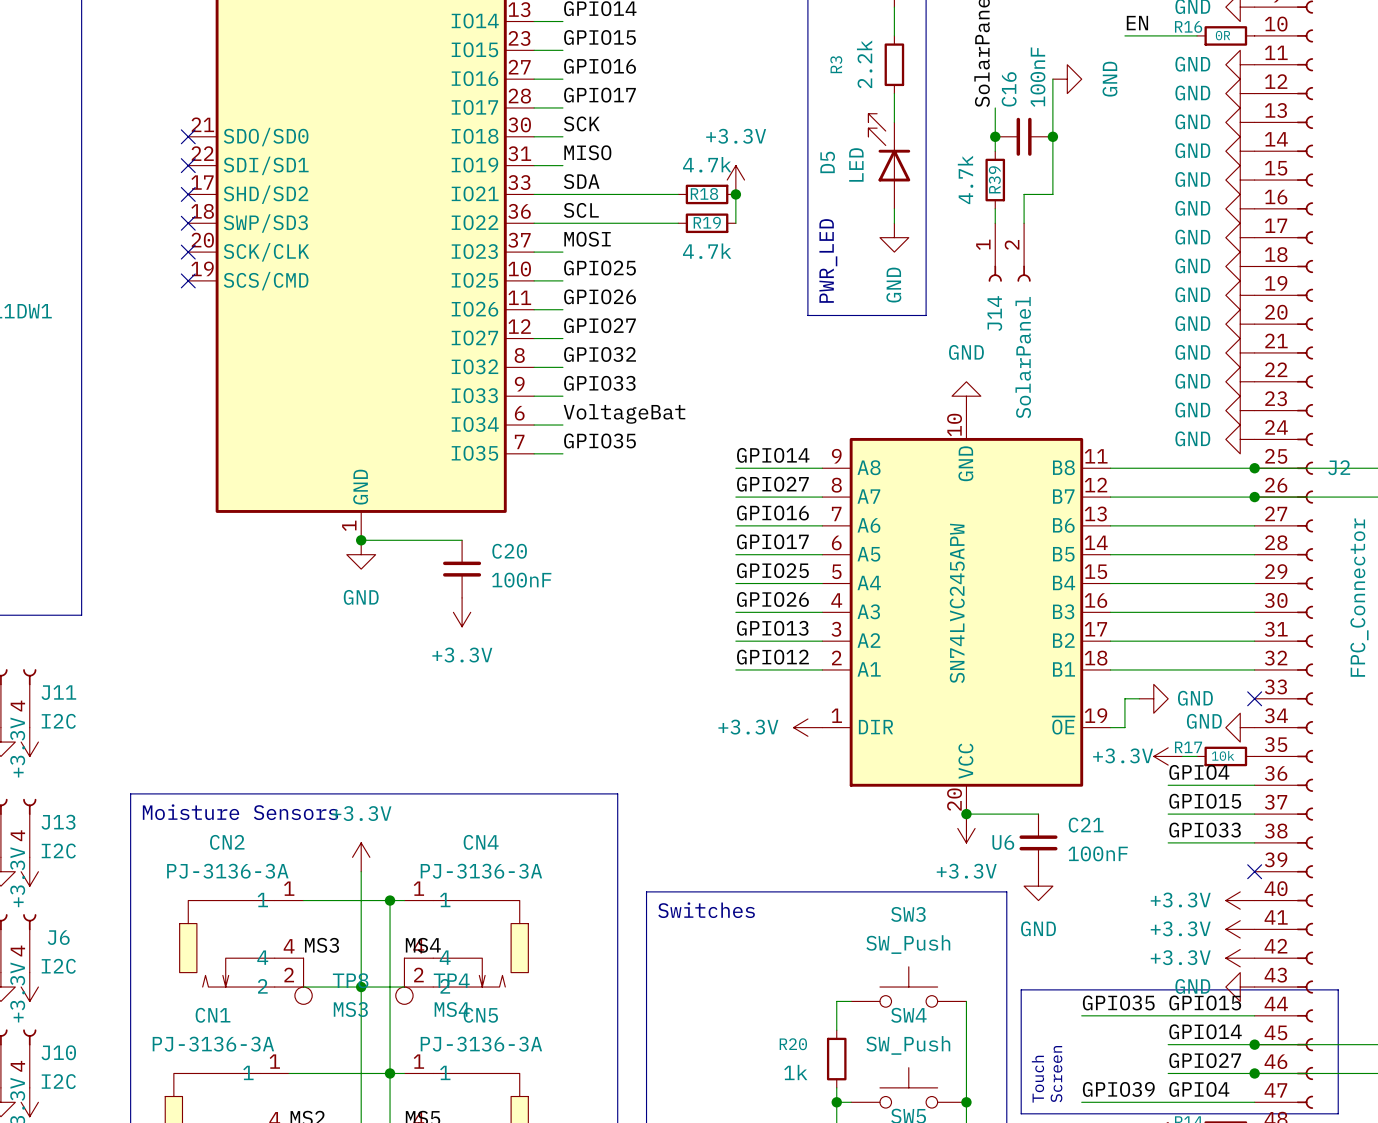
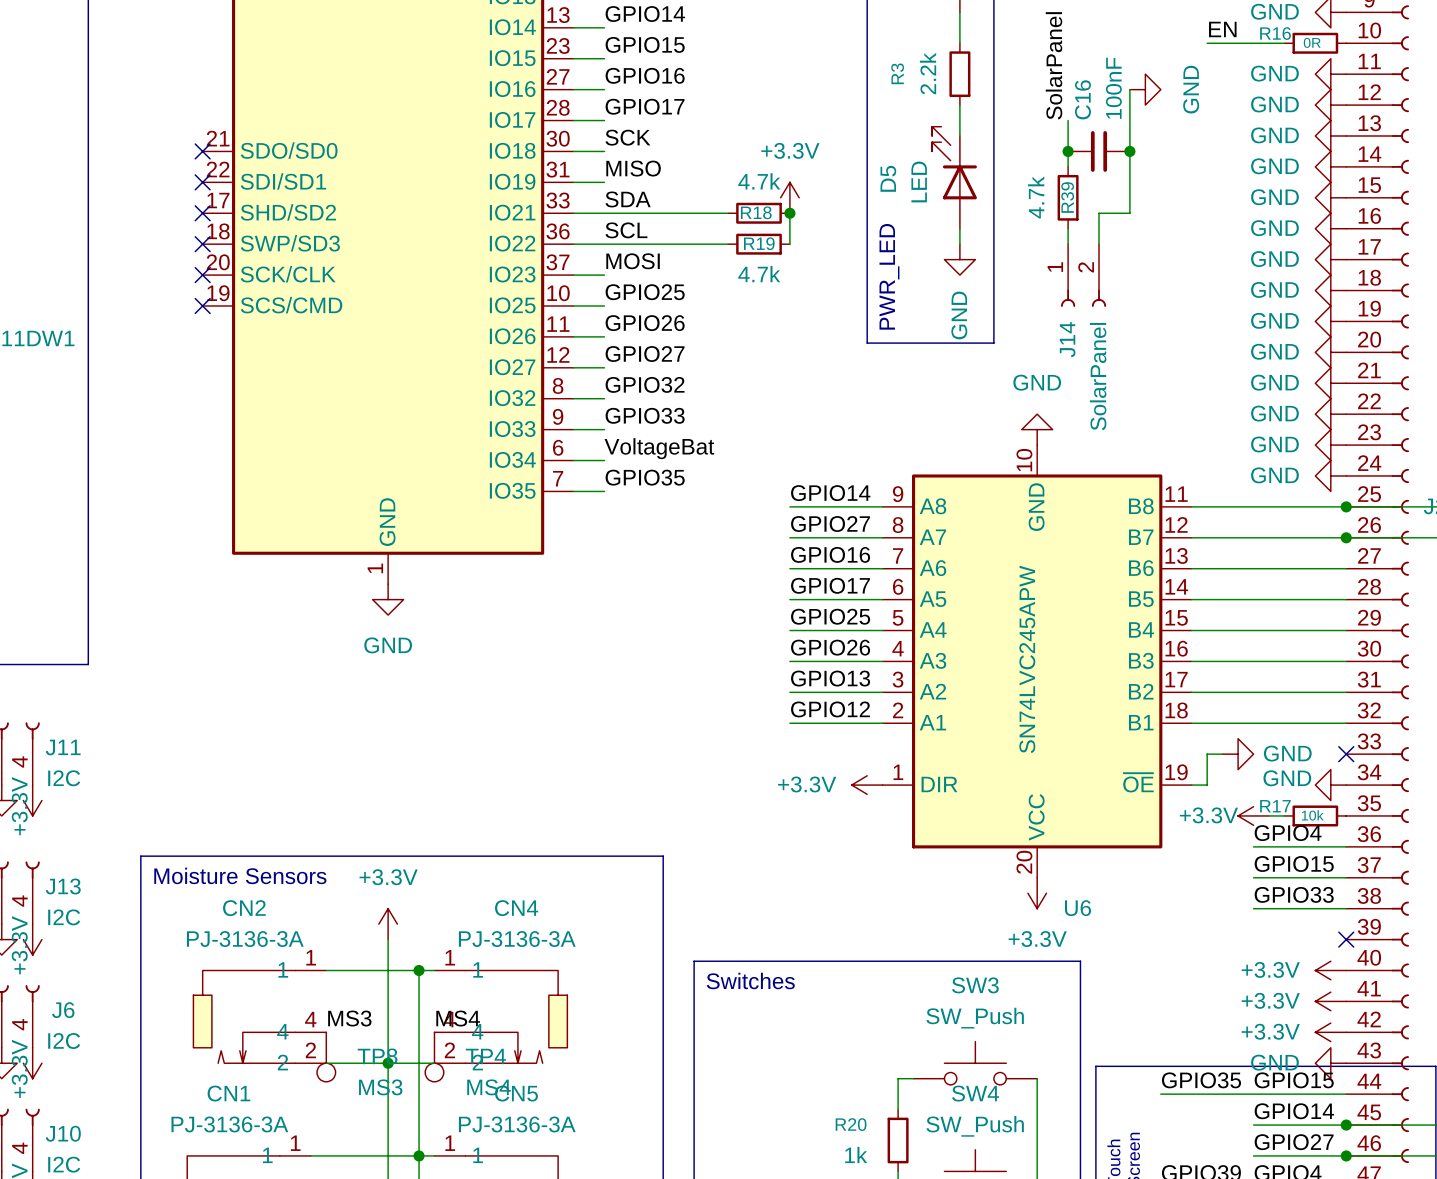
wire: (361, 540) (462, 540) -> none
junction: (361, 540) -> none
C20: 100nF (462, 569) -> none
power symbol: +3.3V (462, 612) -> none
wire: (966, 814) (1038, 814) -> none
junction: (966, 814) -> none
C21: 100nF (1038, 842) -> none
power symbol: GND (1038, 886) -> none

